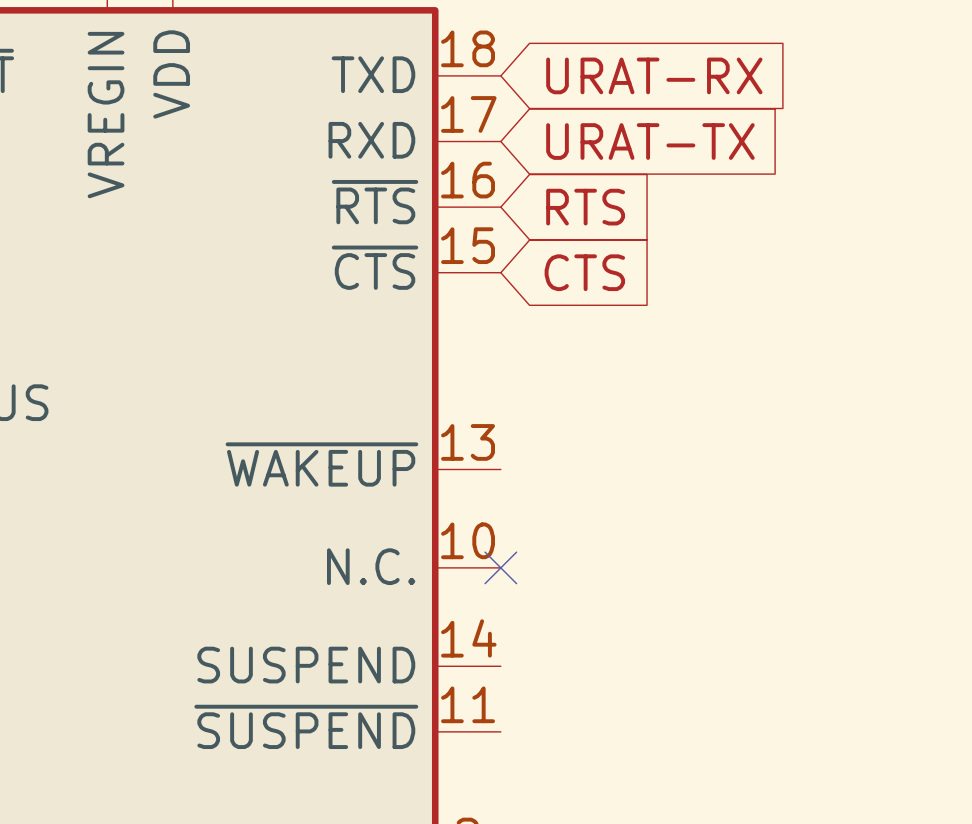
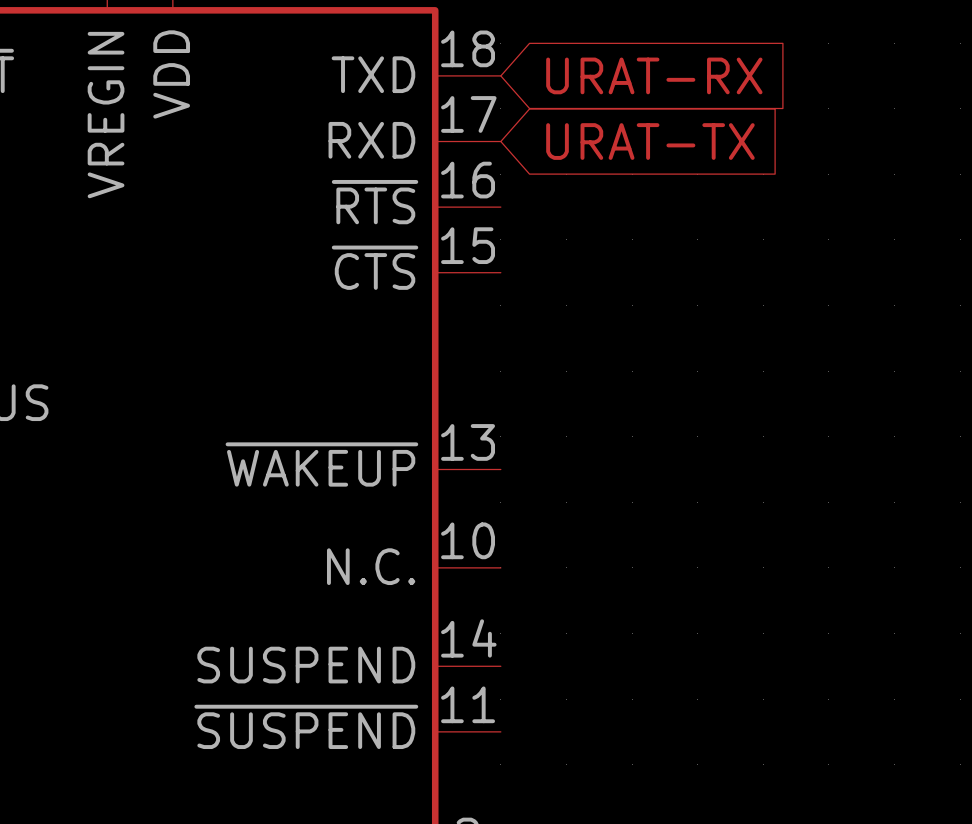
global label: RTS (585, 207) -> none
global label: CTS (584, 272) -> none
no-connect mark: (500, 567) -> none

